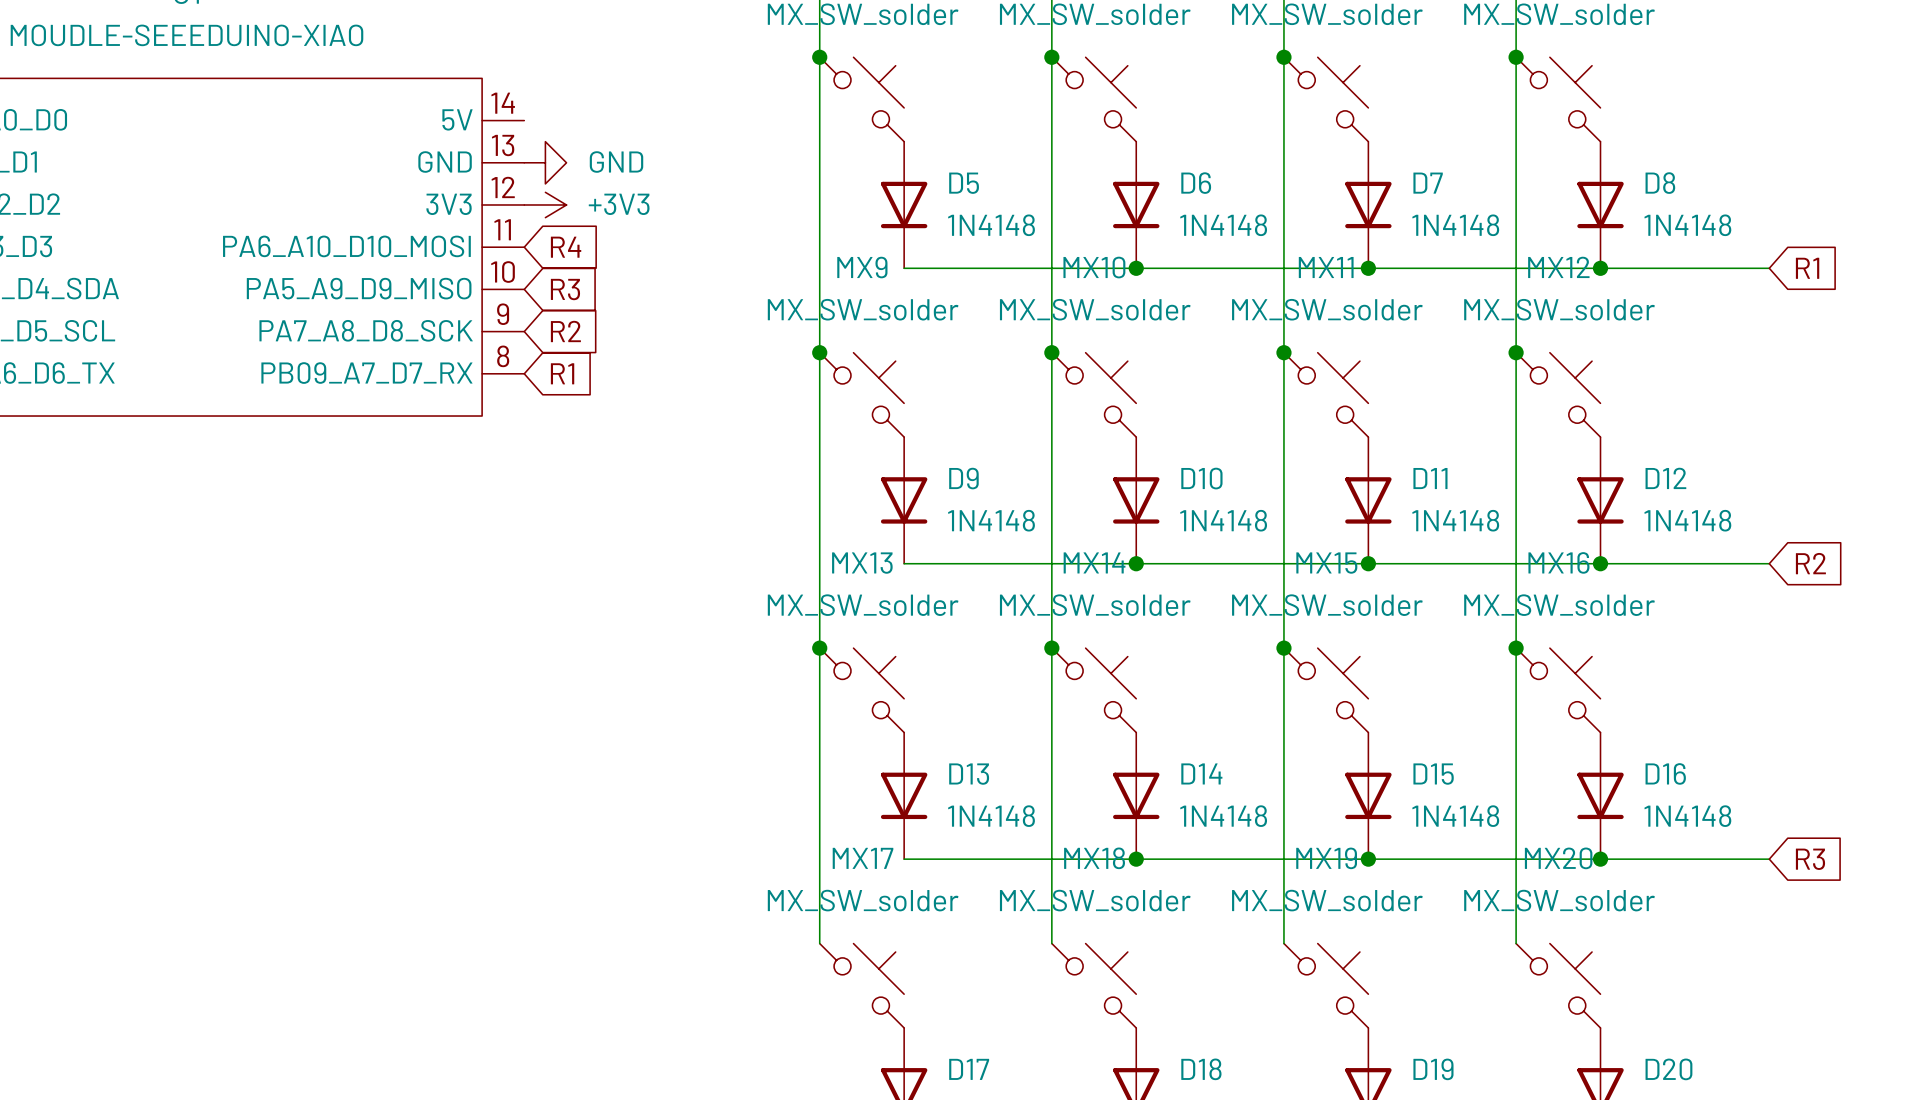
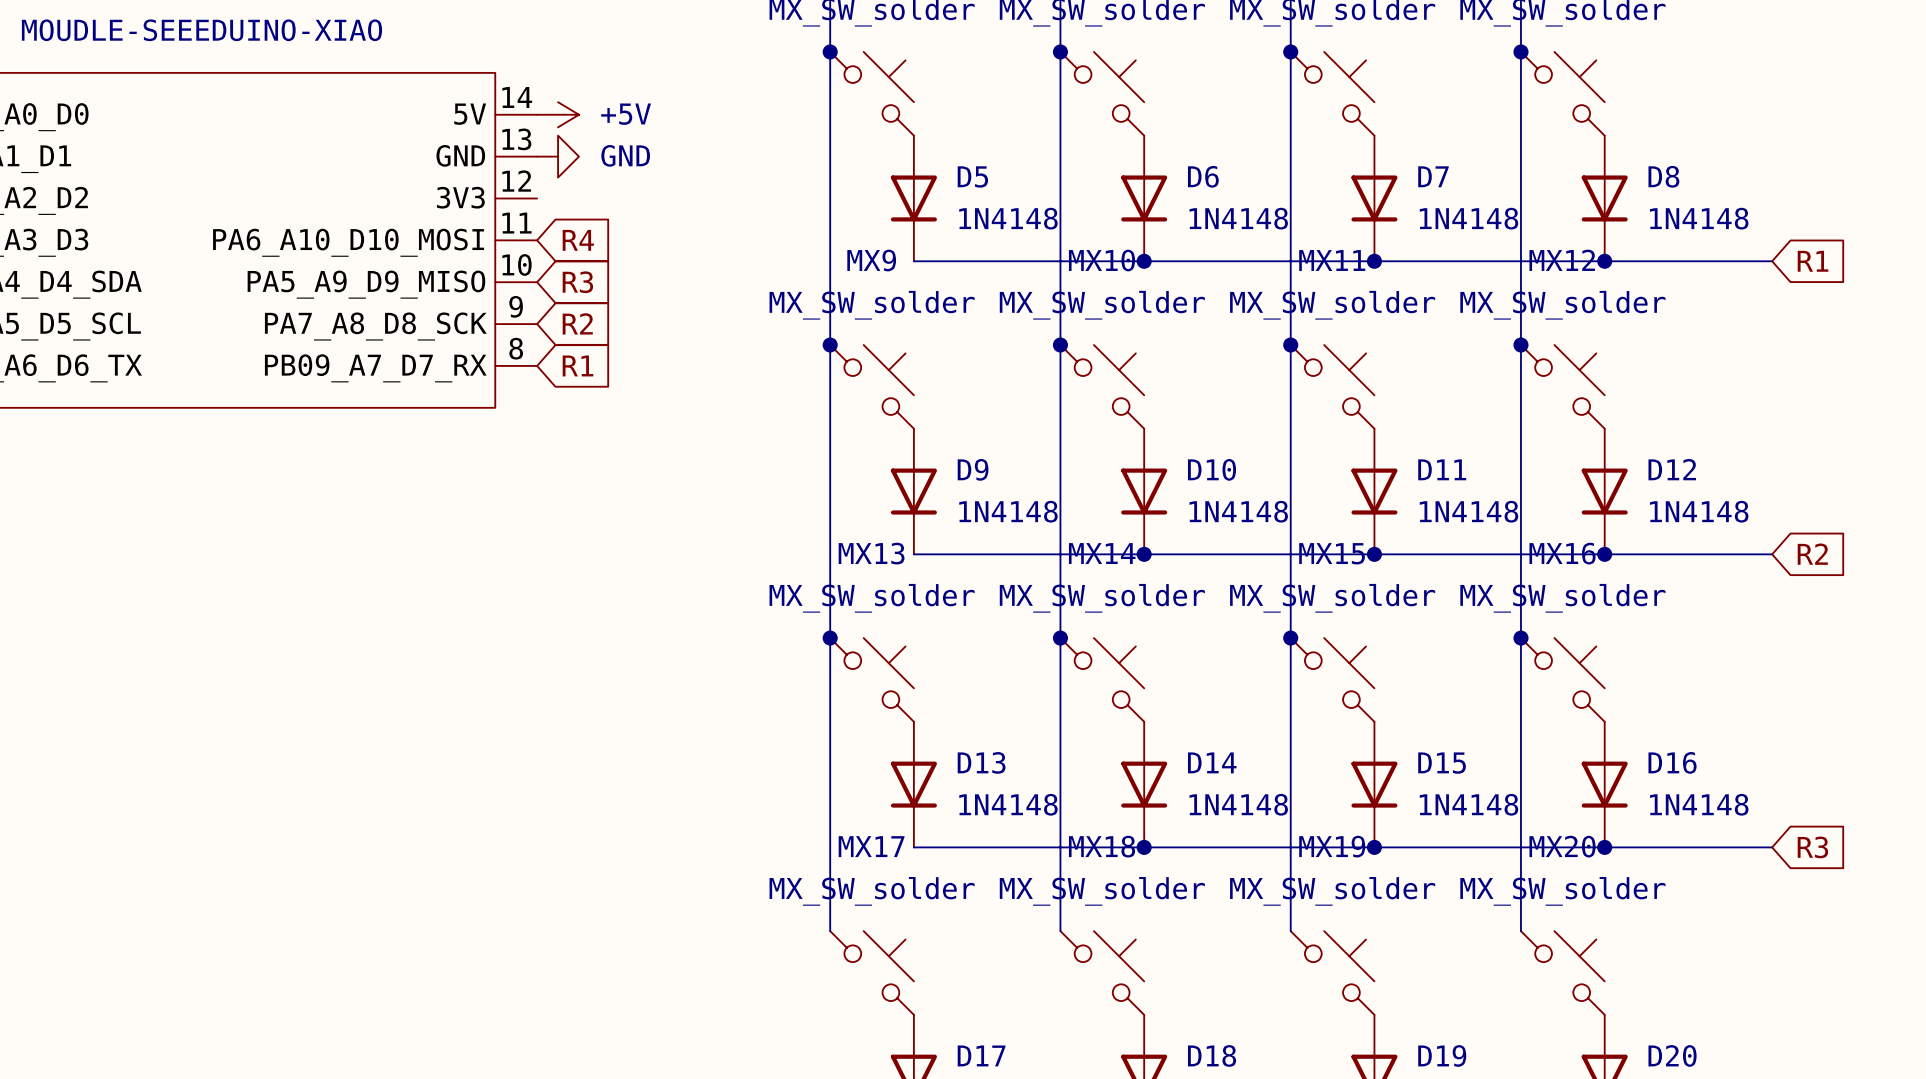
power symbol: none -> +5V (558, 114)
power symbol: +3V3 (545, 204) -> none

